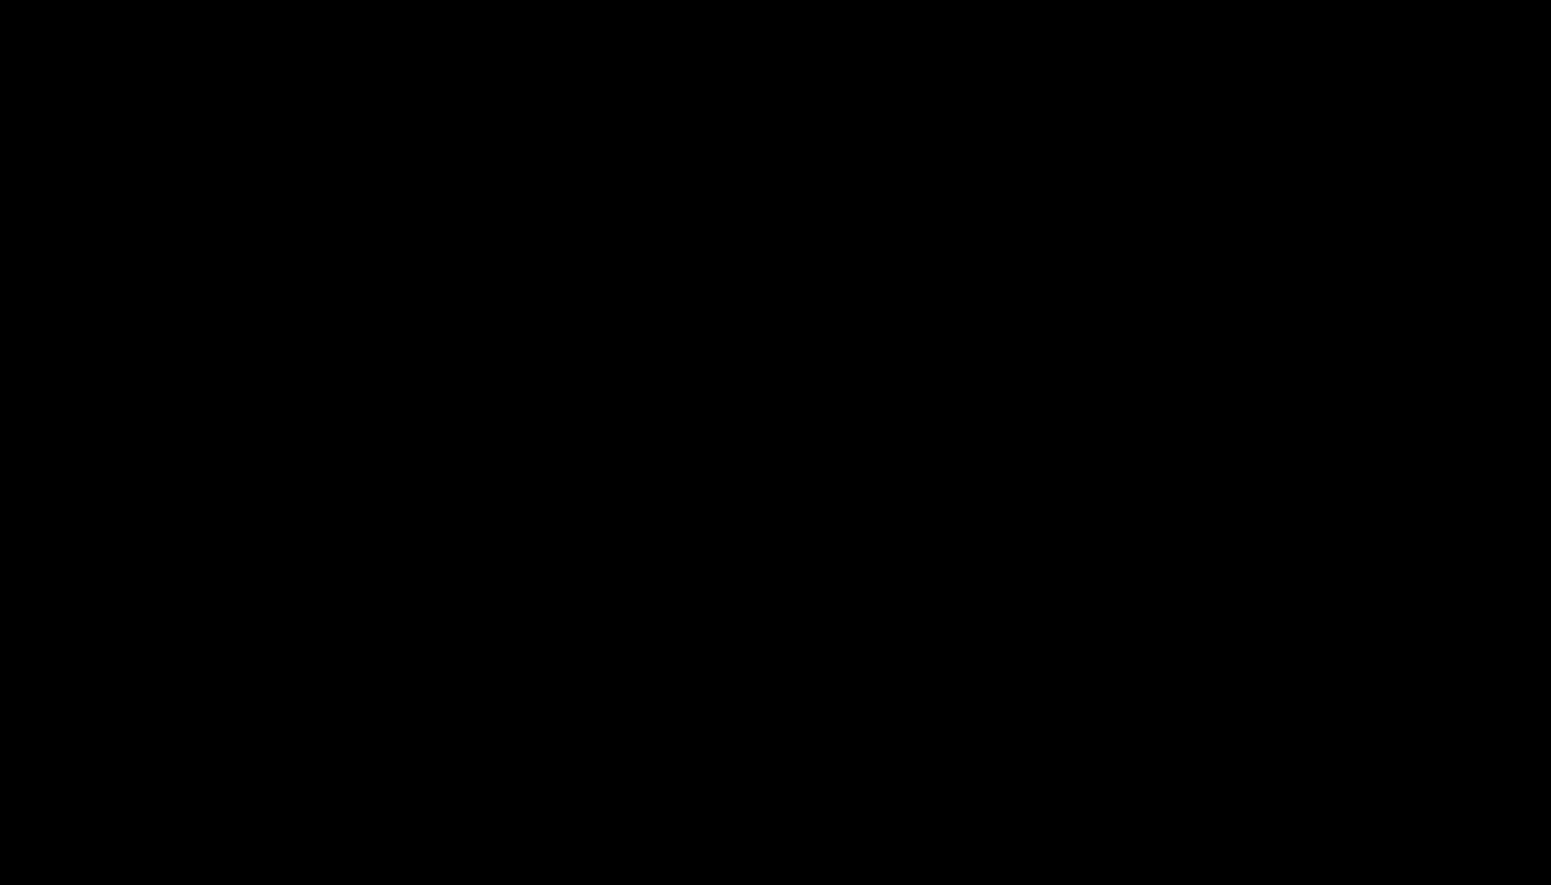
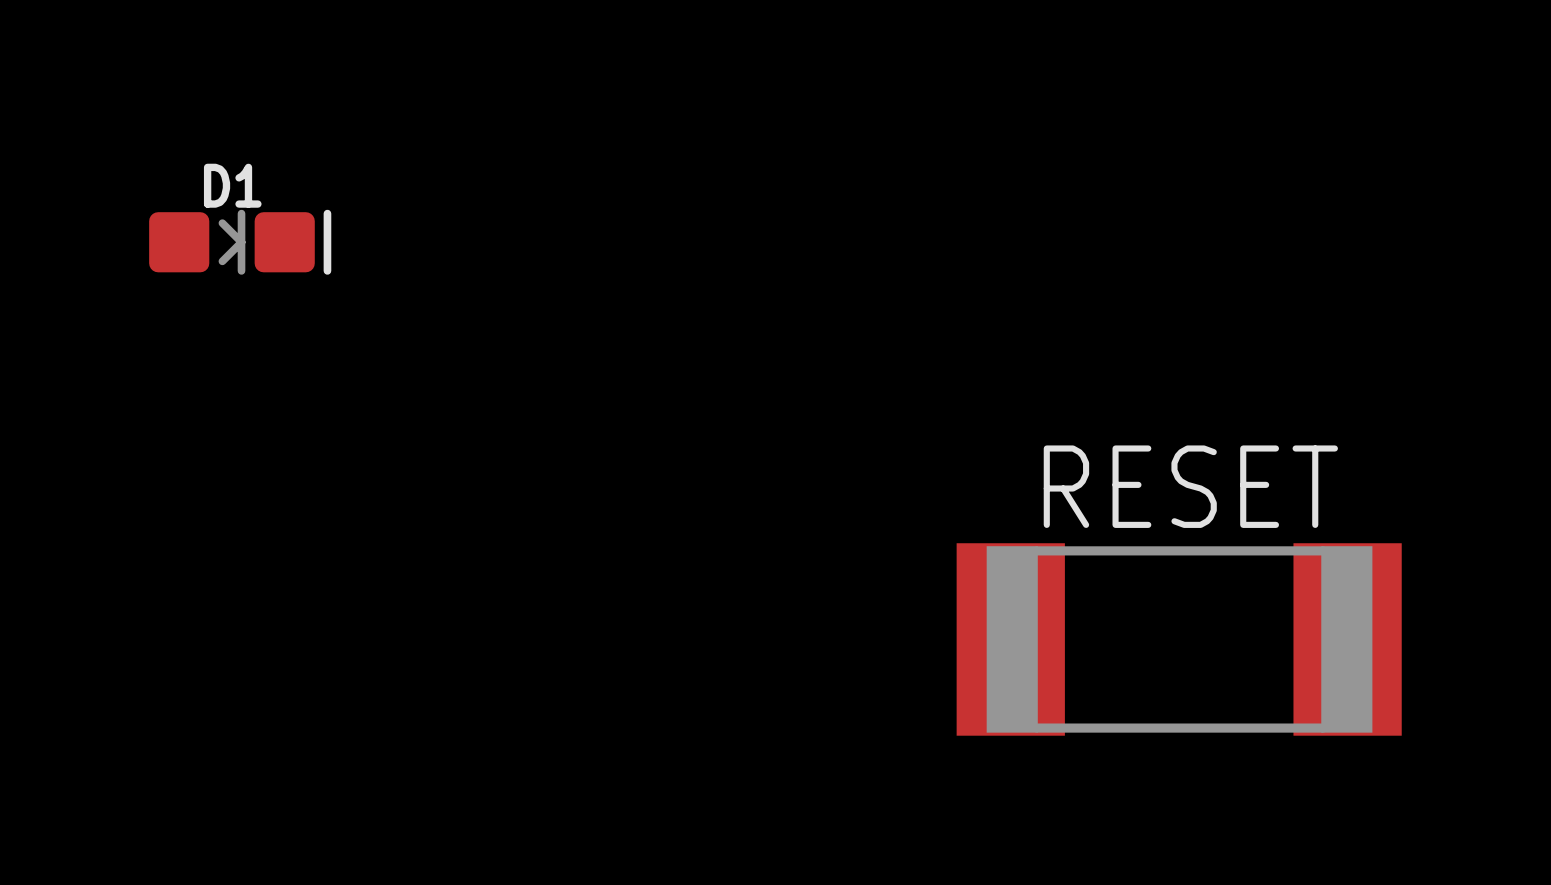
D1: none -> (240, 242)
RESET: none -> (1179, 639)

